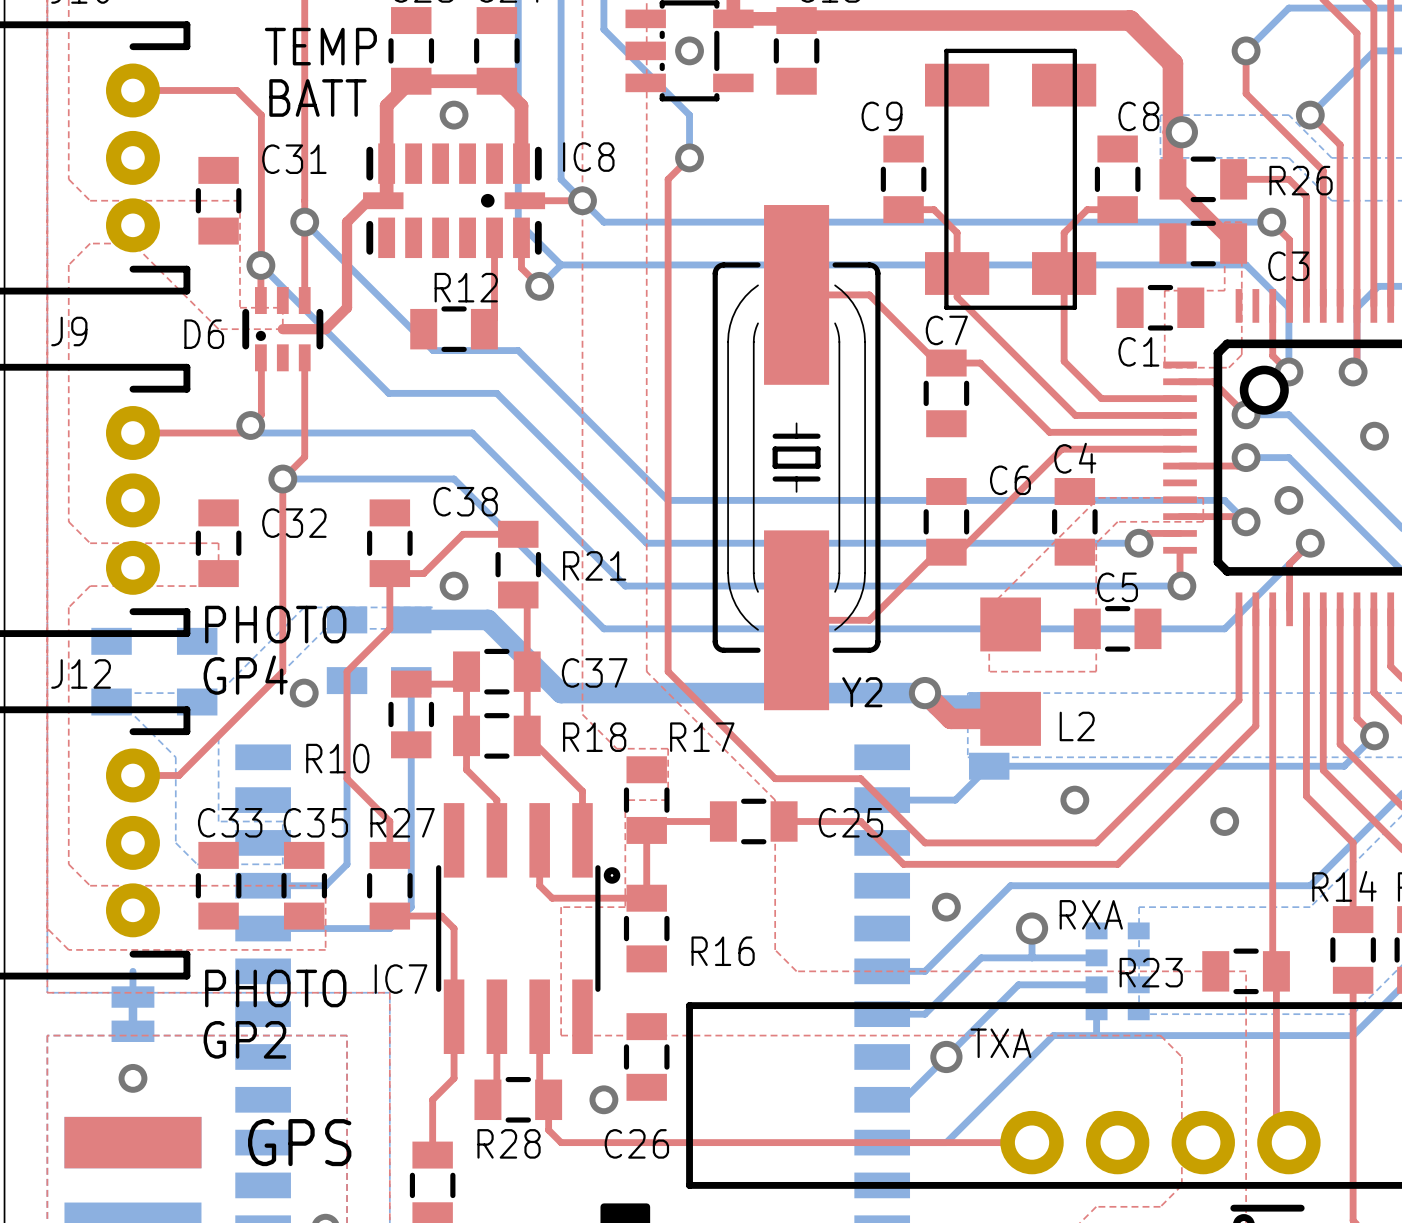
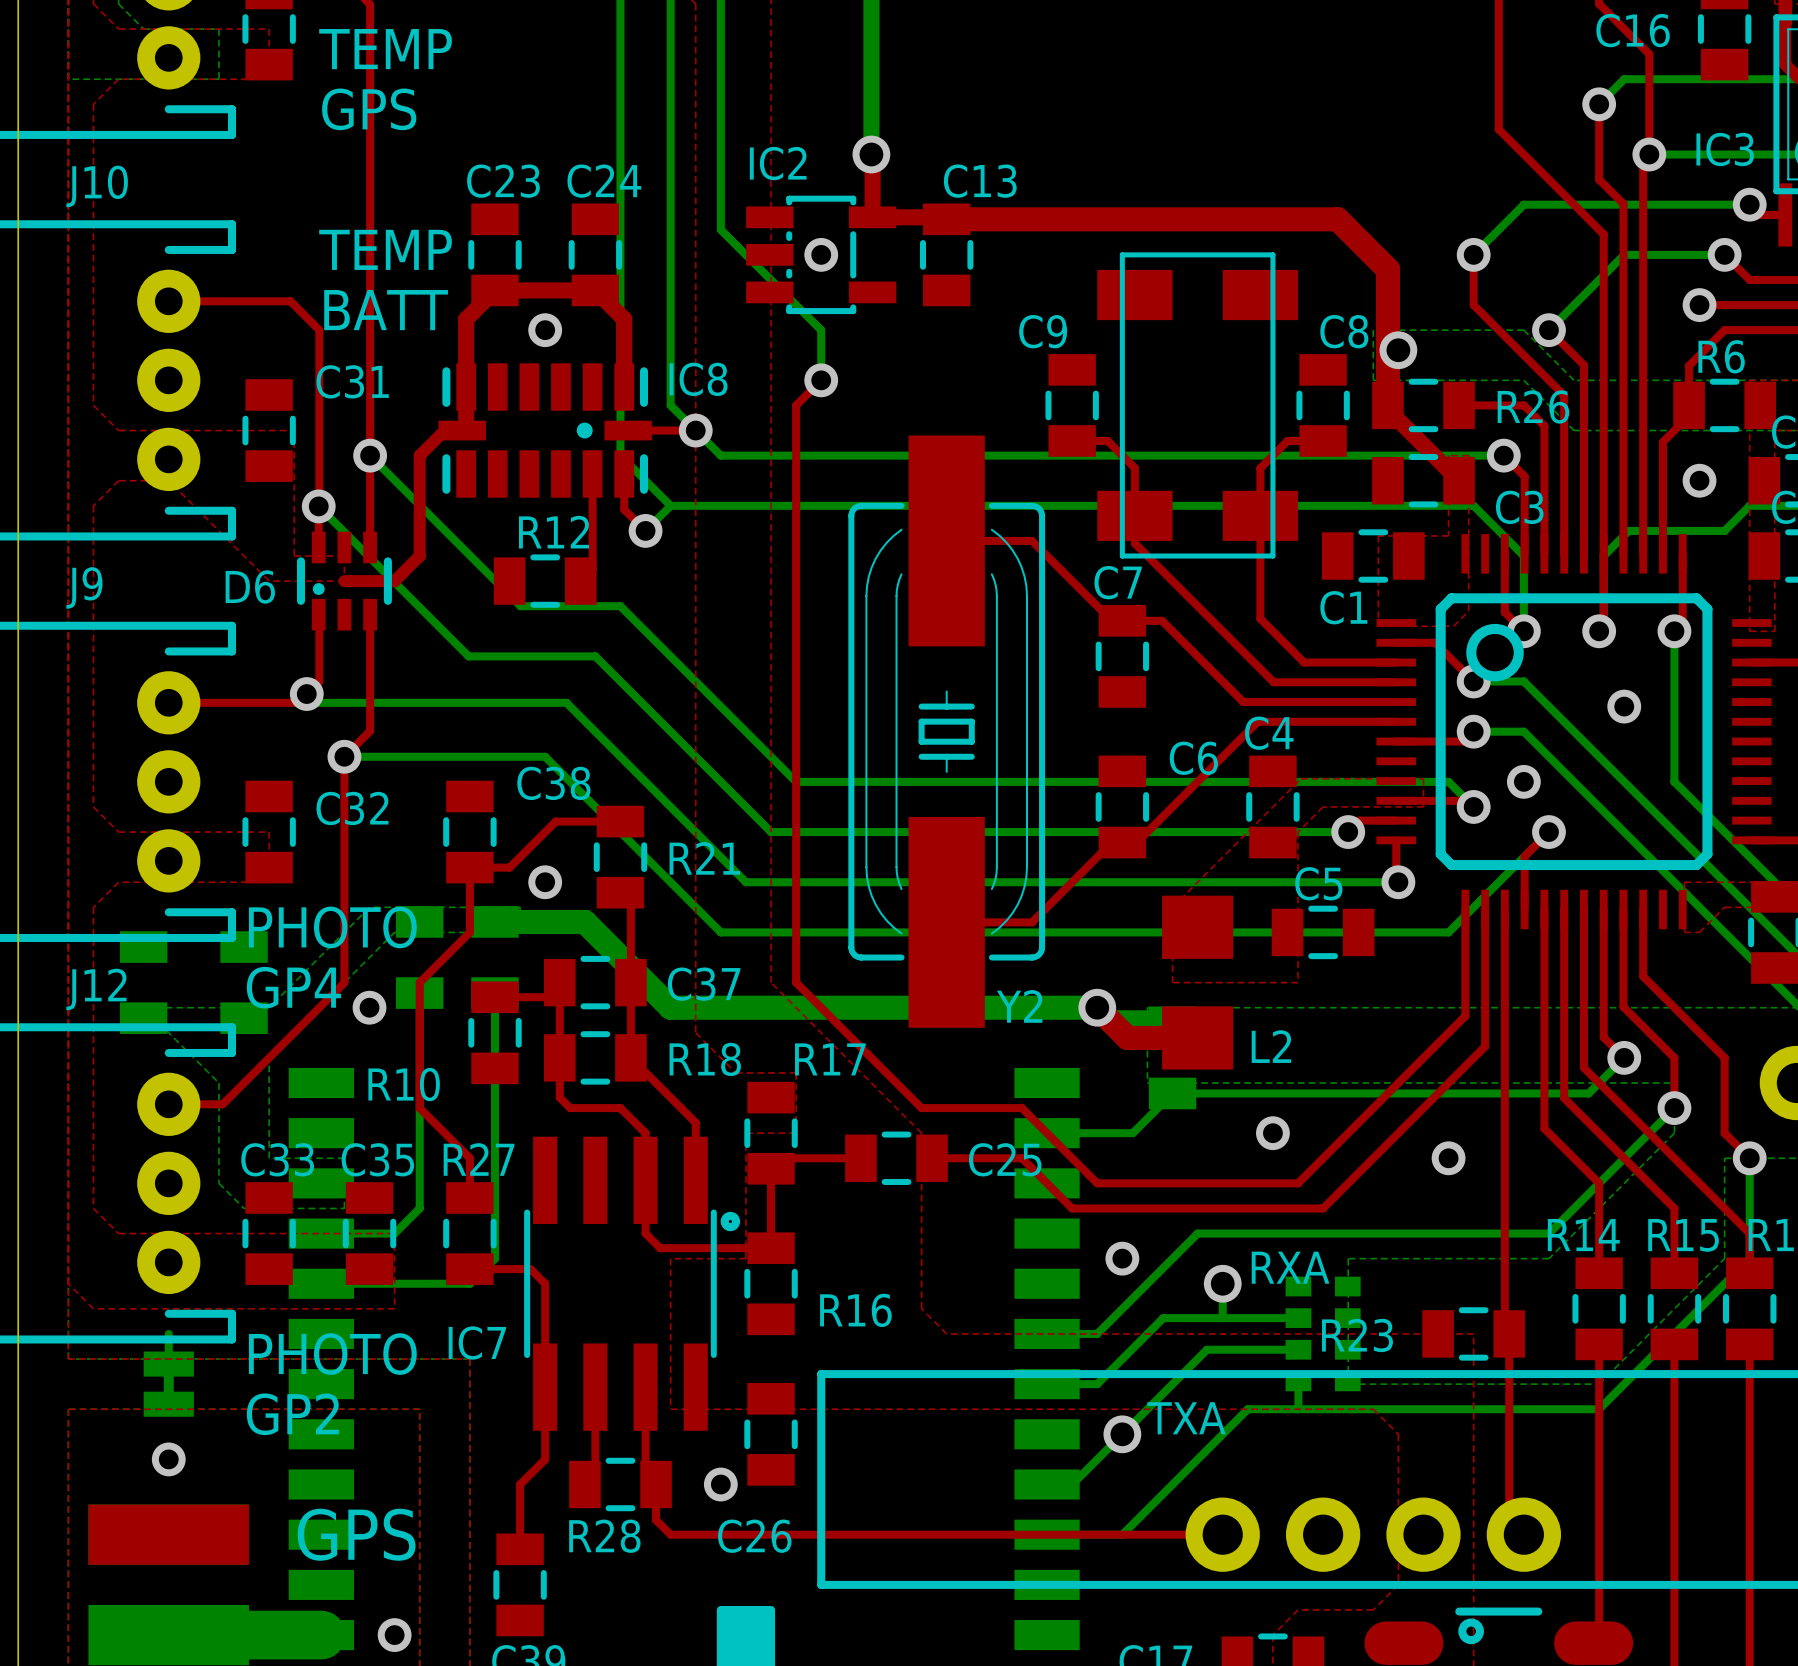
top track: (475, 778) (496, 800) (496, 840) -> (570, 1108) (620, 1108) (645, 1133) (645, 1180)

